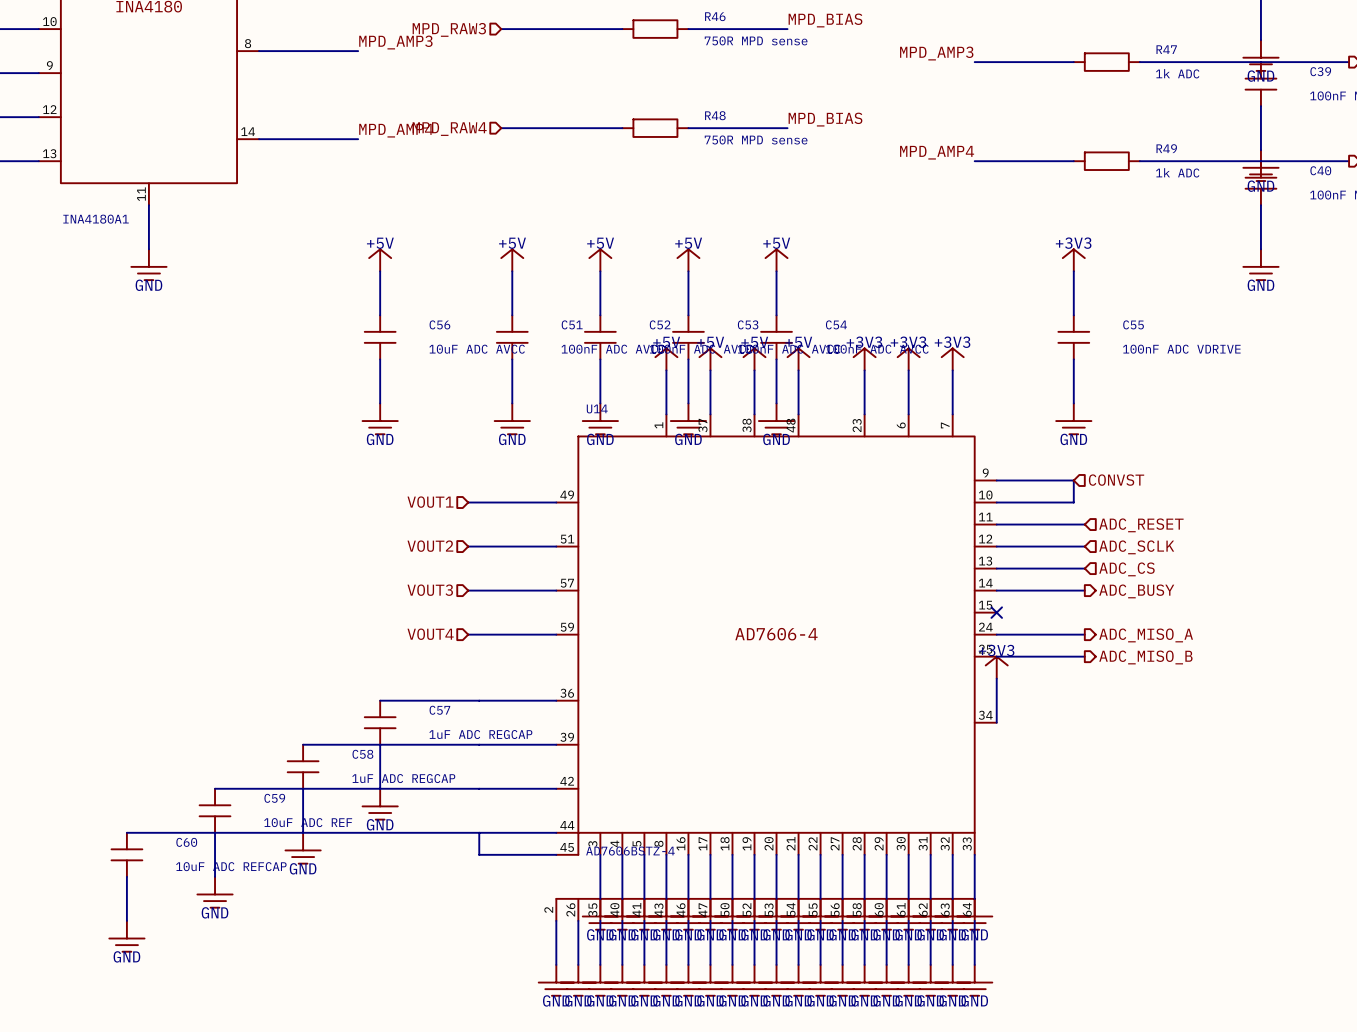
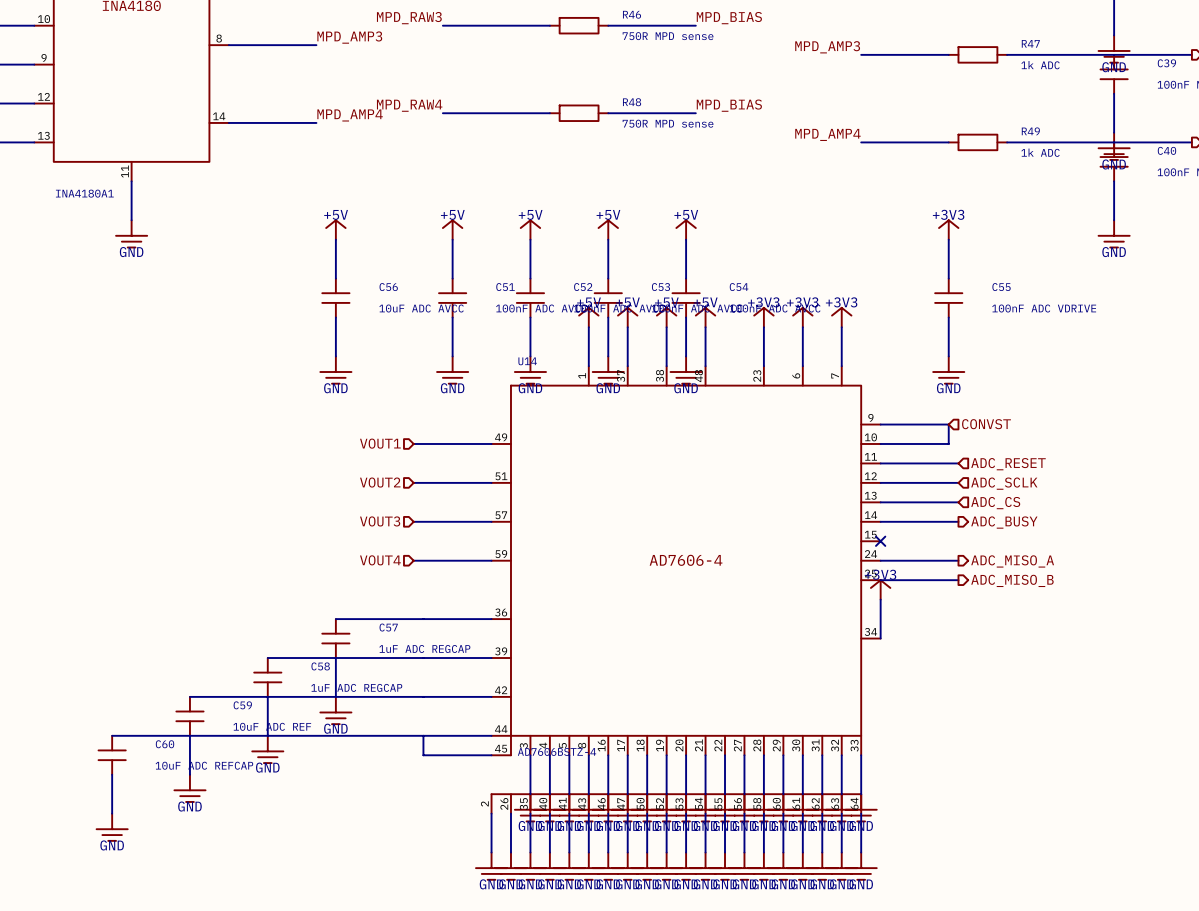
label: none -> MPD_RAW3 (409, 18)
hierarchical label: MPD_RAW3 (449, 29) -> none
label: none -> MPD_RAW4 (409, 105)
hierarchical label: MPD_RAW4 (449, 129) -> none

